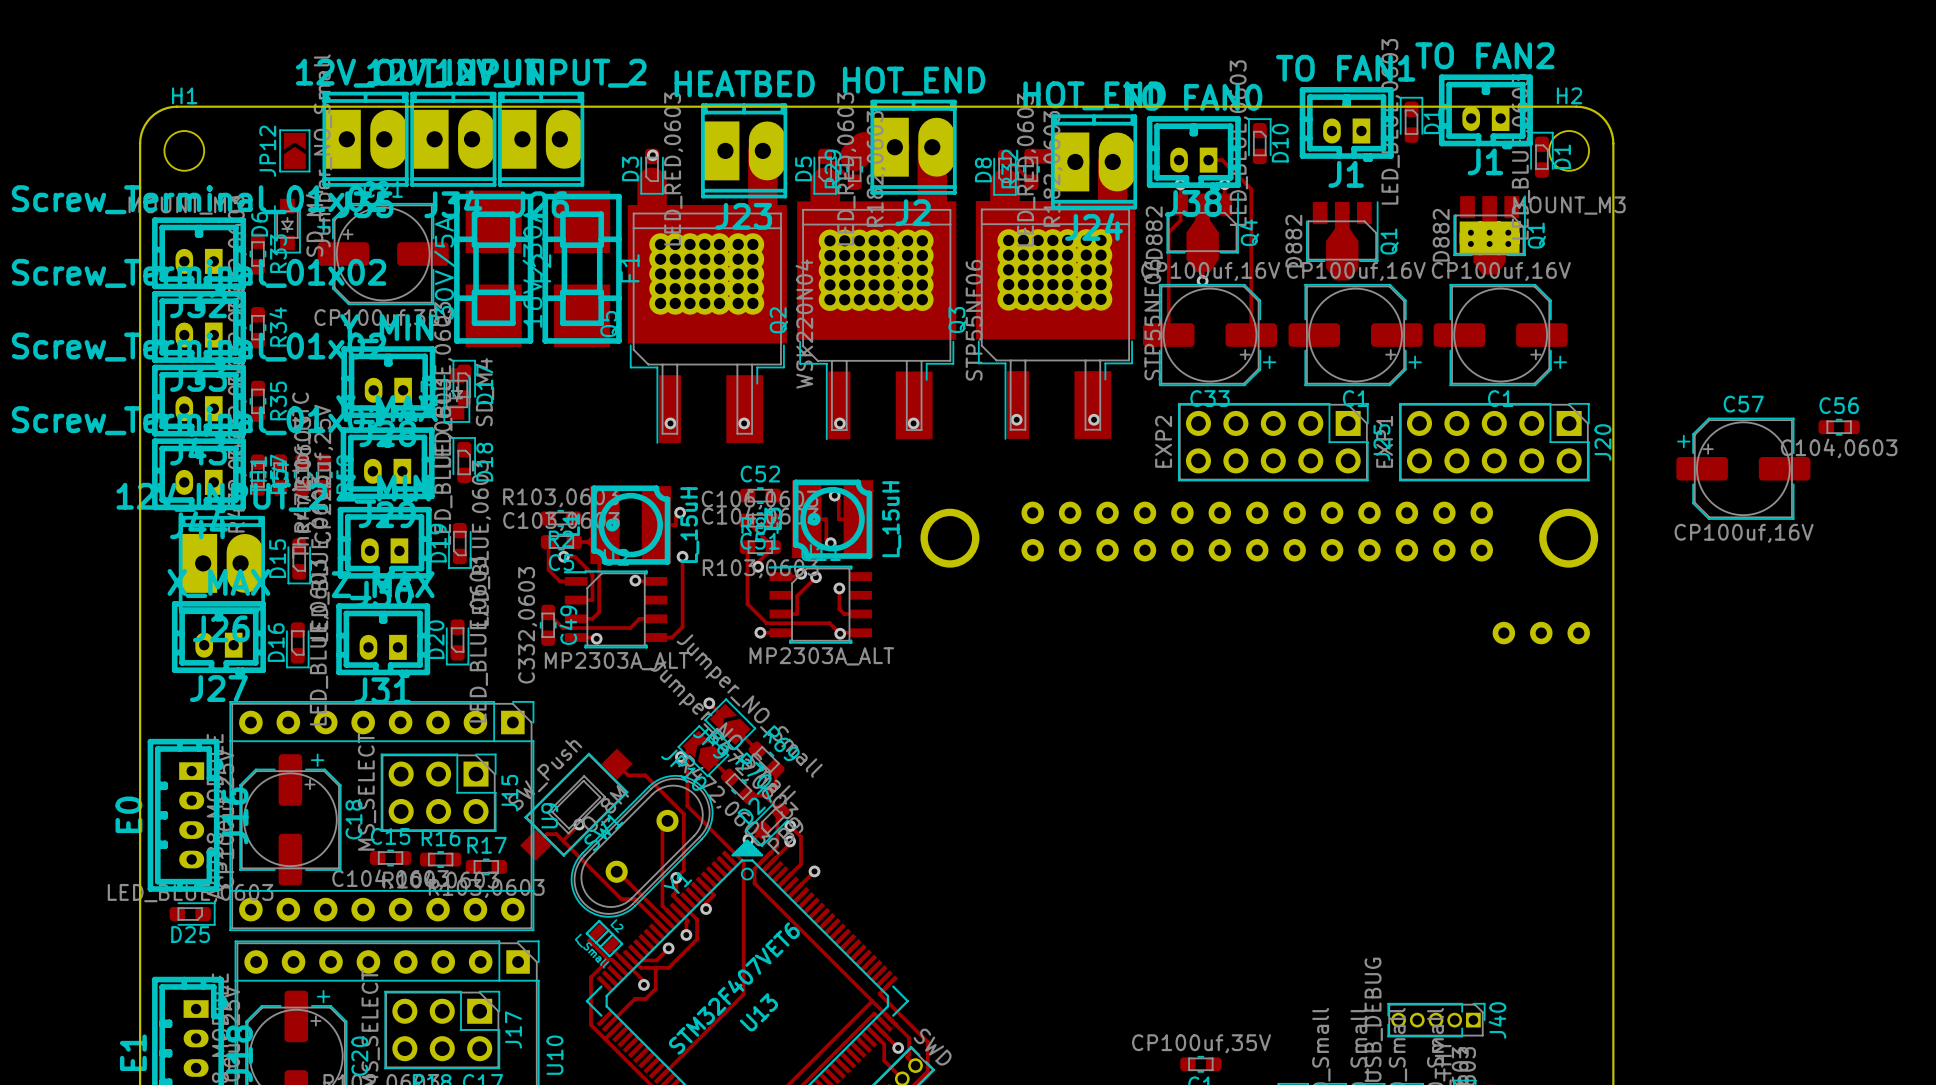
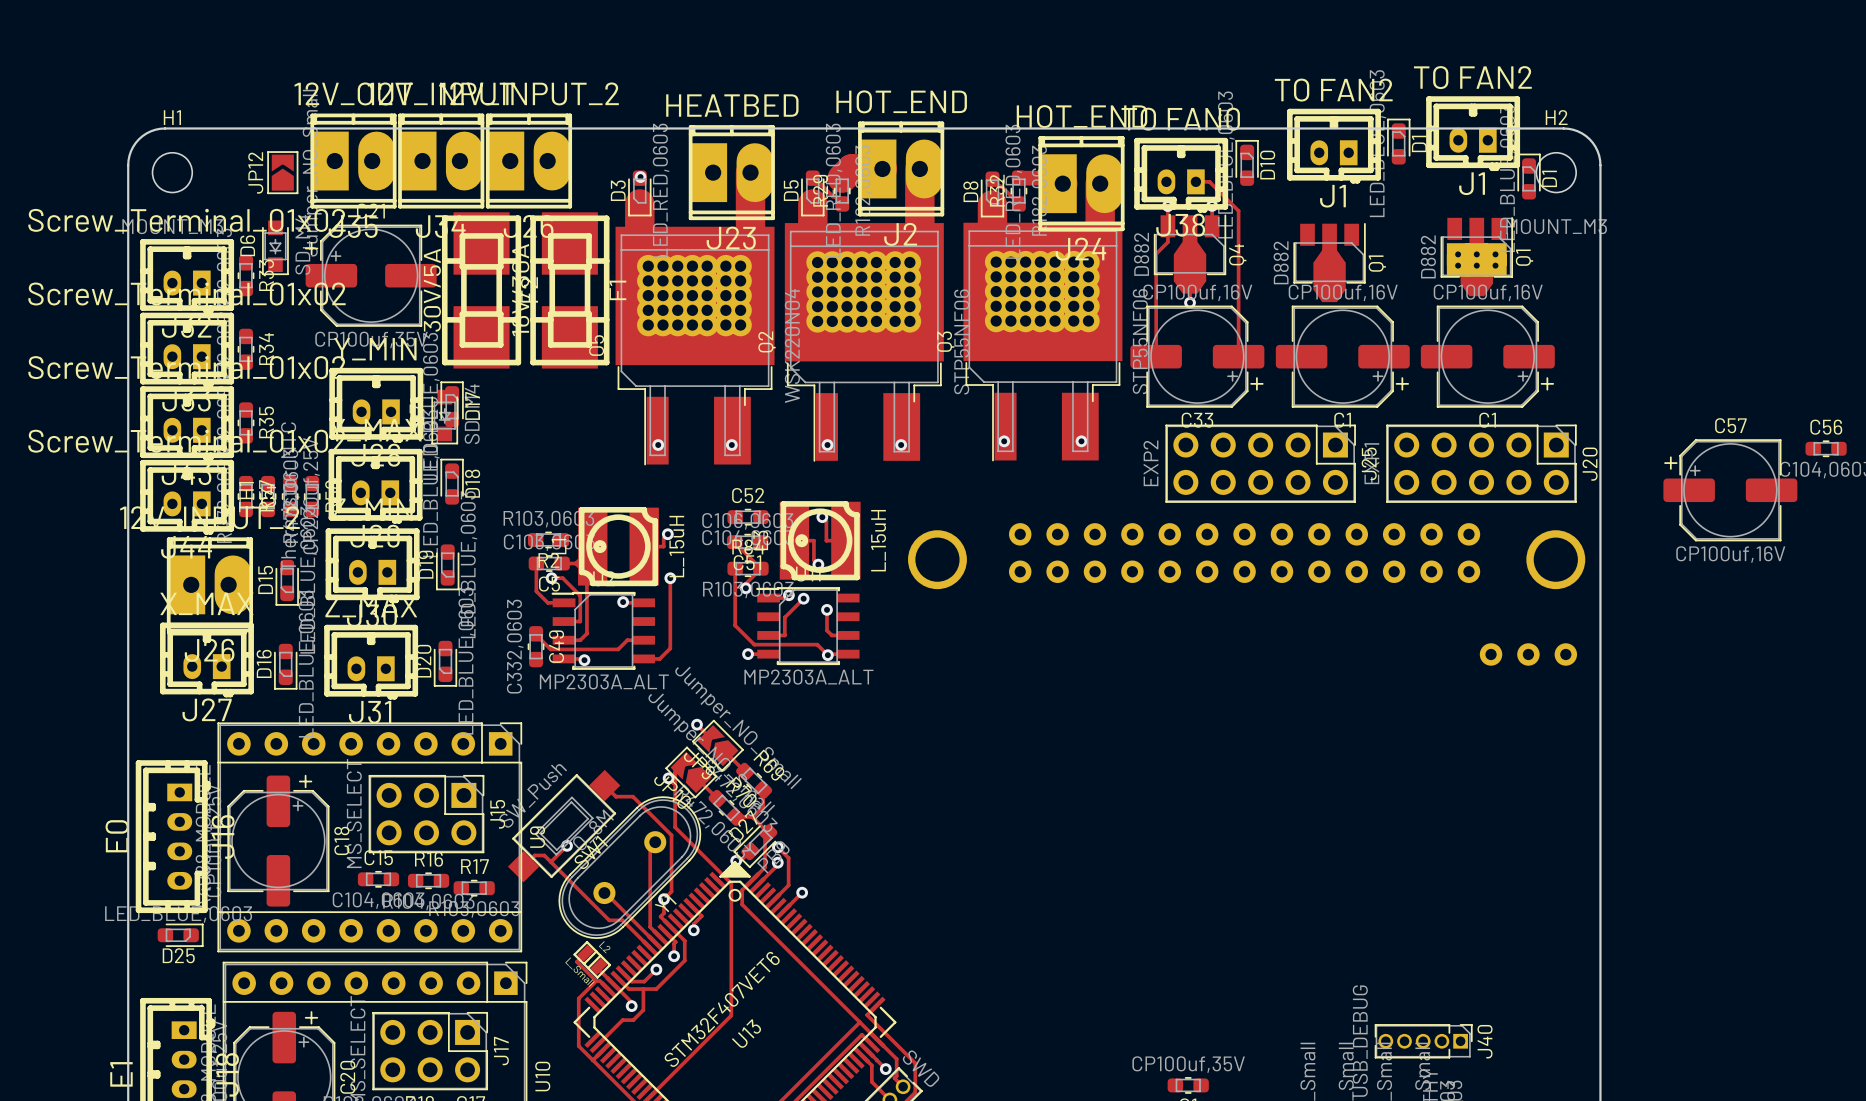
J1 value: TO FAN1 (1345, 68) -> TO FAN2 (1333, 90)

